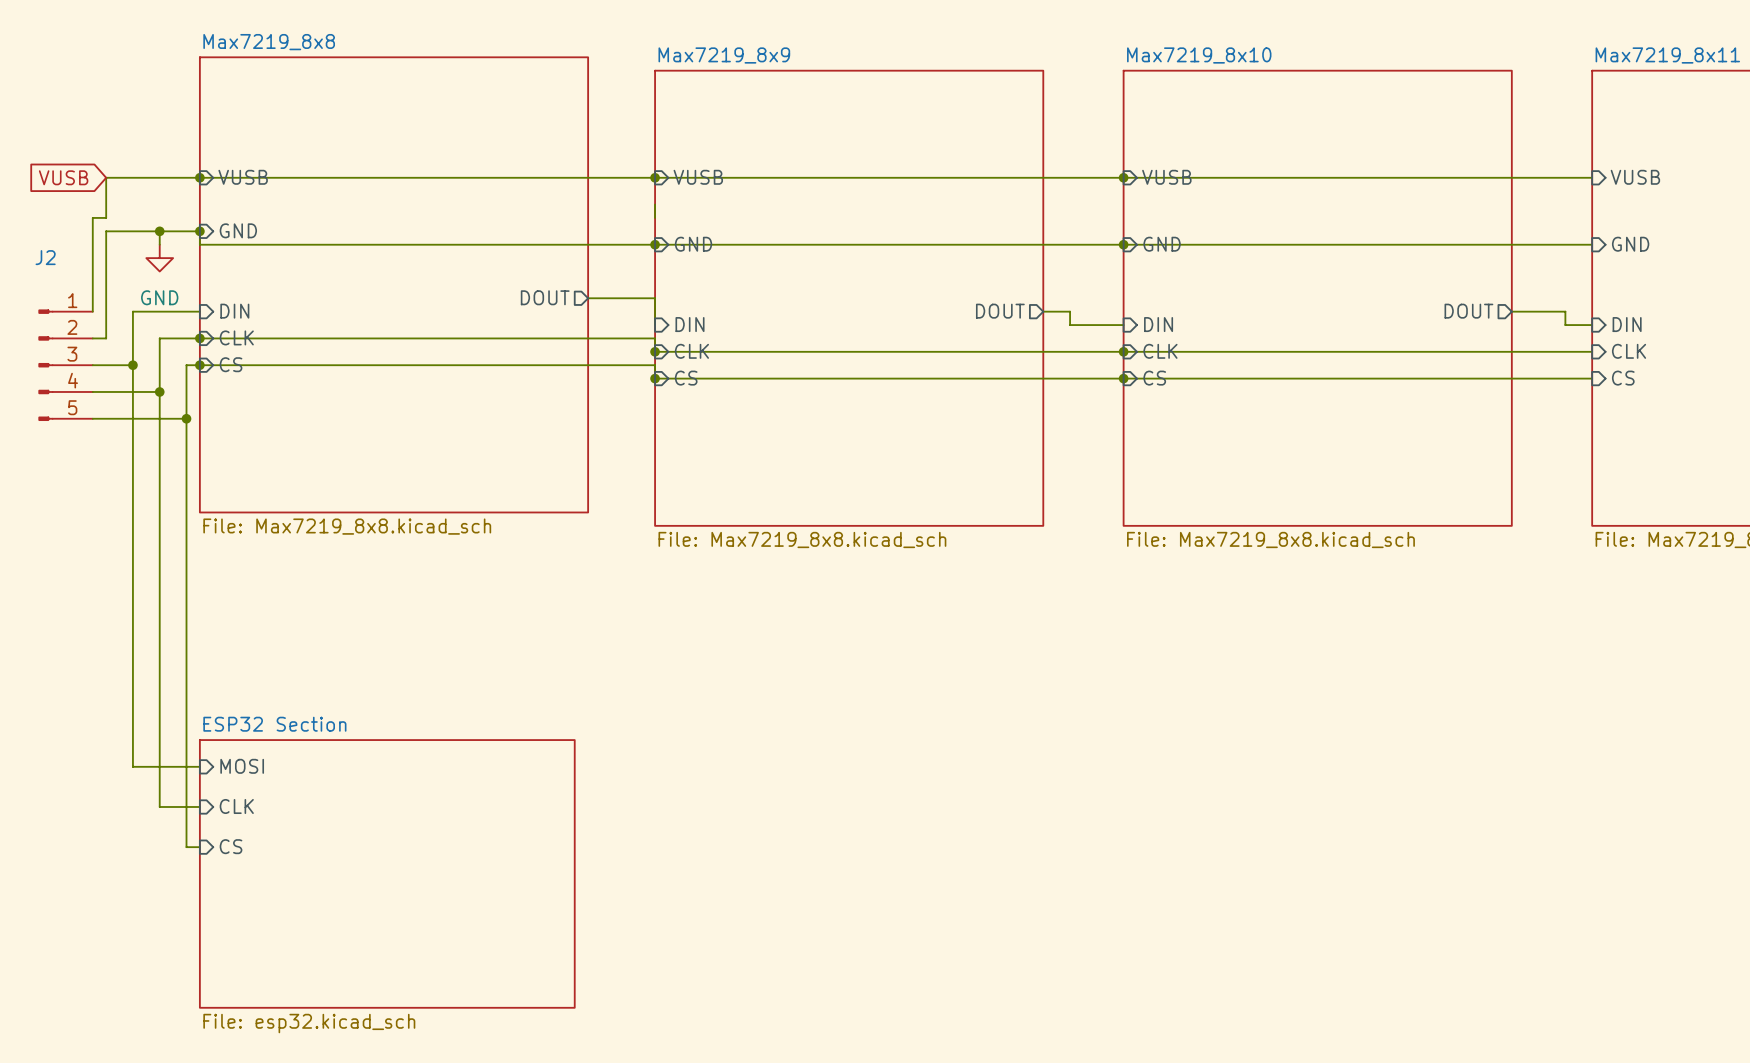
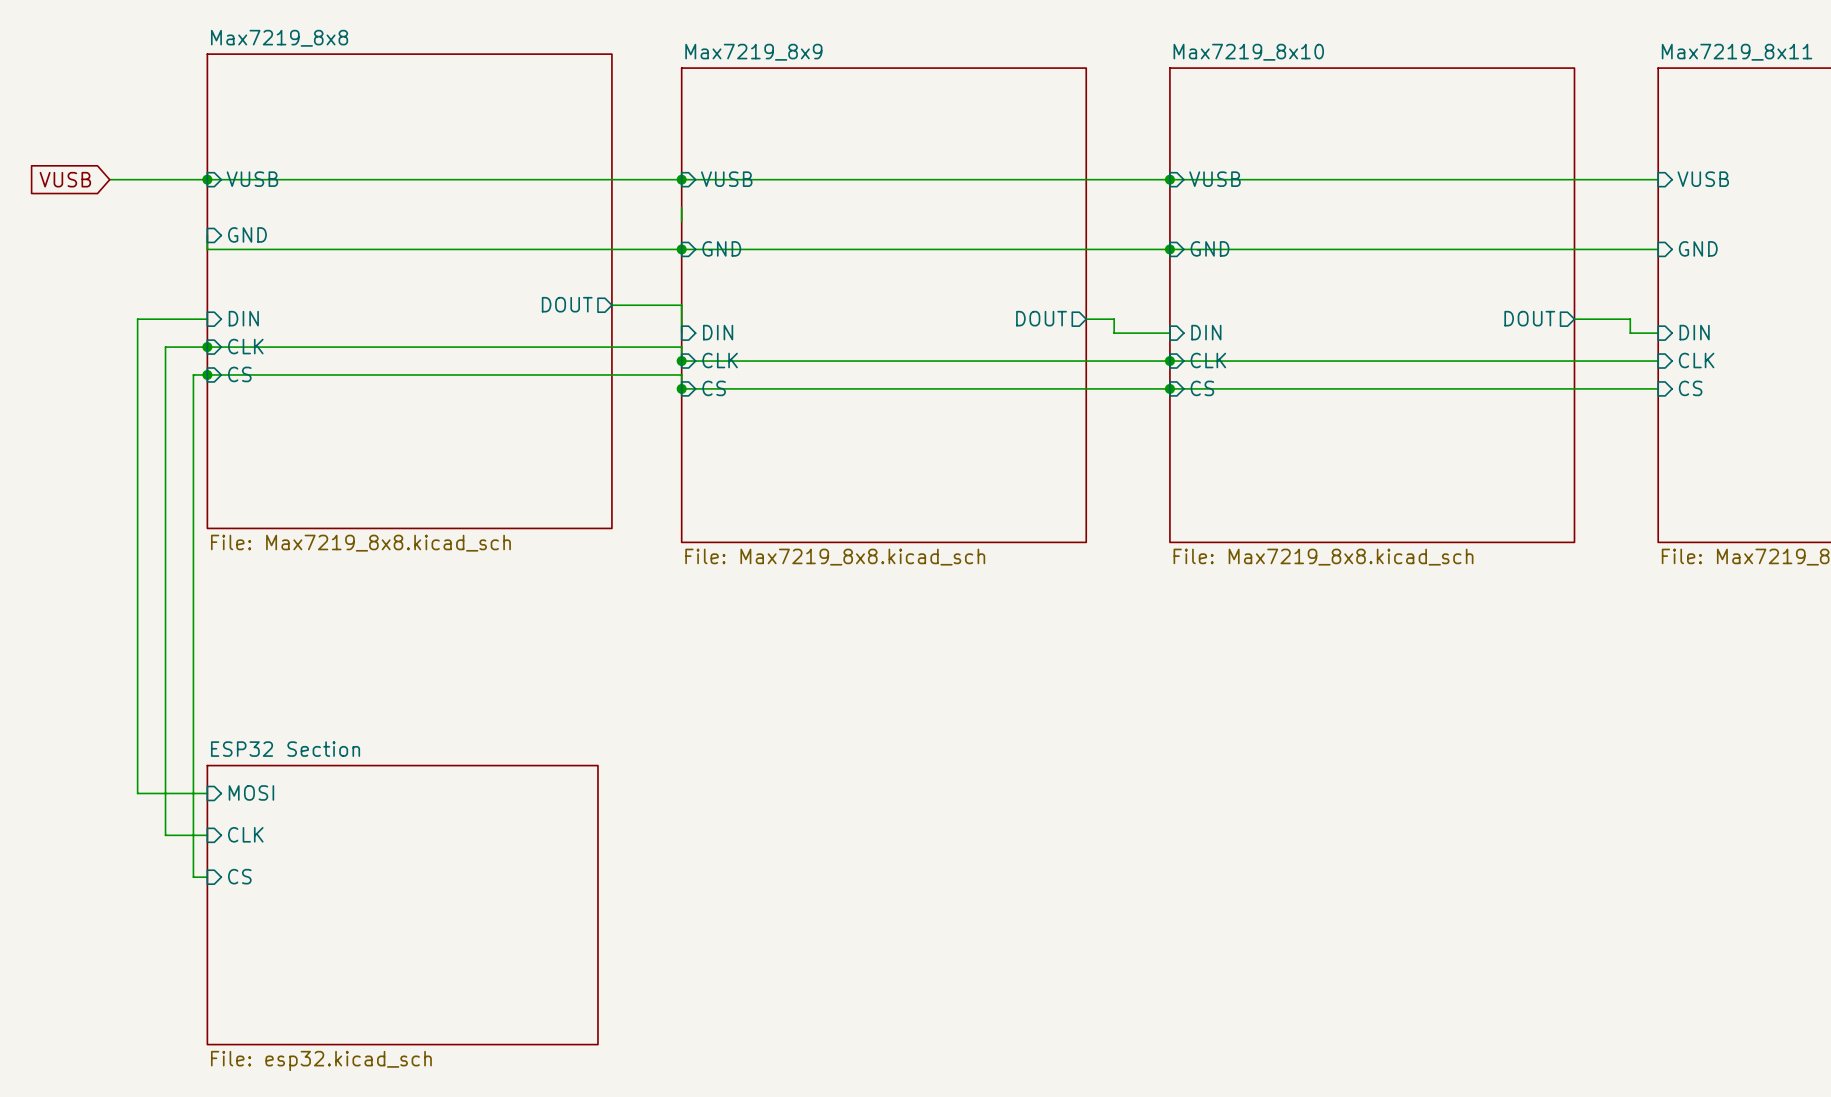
wire: (106, 177) (106, 217) (92, 217) (92, 311) -> none
wire: (159, 231) (159, 244) -> none
junction: (159, 231) -> none
wire: (199, 231) (106, 231) (106, 338) (92, 338) -> none
junction: (199, 231) -> none
power symbol: GND (159, 258) -> none
J2: (65, 365) -> none
wire: (92, 365) (132, 365) -> none
junction: (132, 365) -> none
wire: (92, 391) (159, 391) -> none
junction: (159, 391) -> none
wire: (92, 418) (186, 418) -> none
junction: (186, 418) -> none

